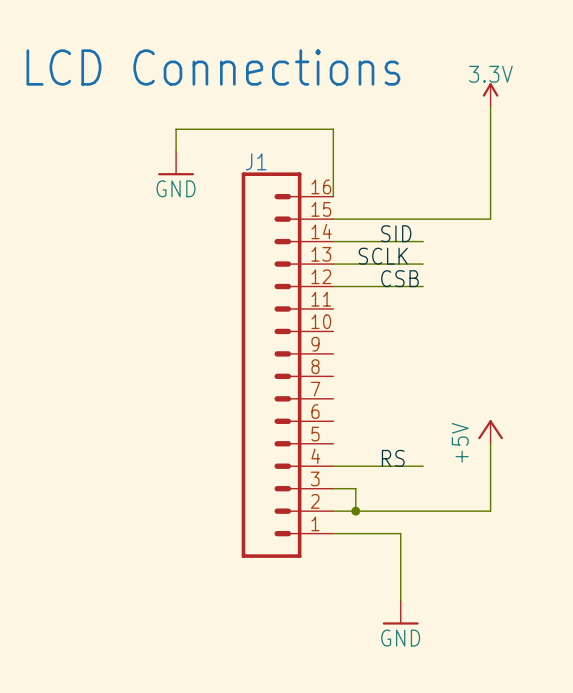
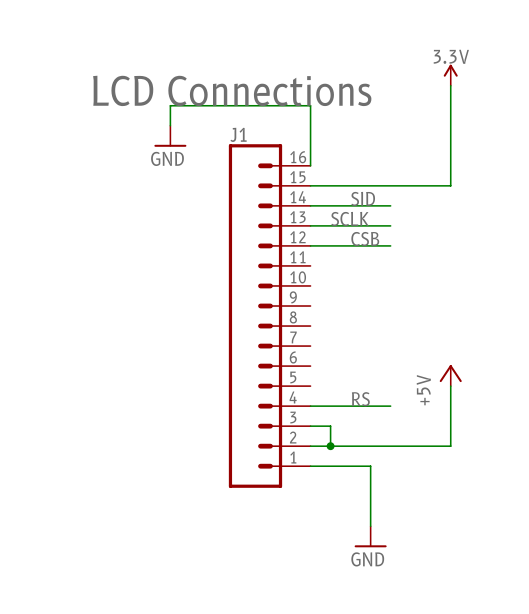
text position: LCD Connections (213, 67) -> LCD Connections (232, 90)

